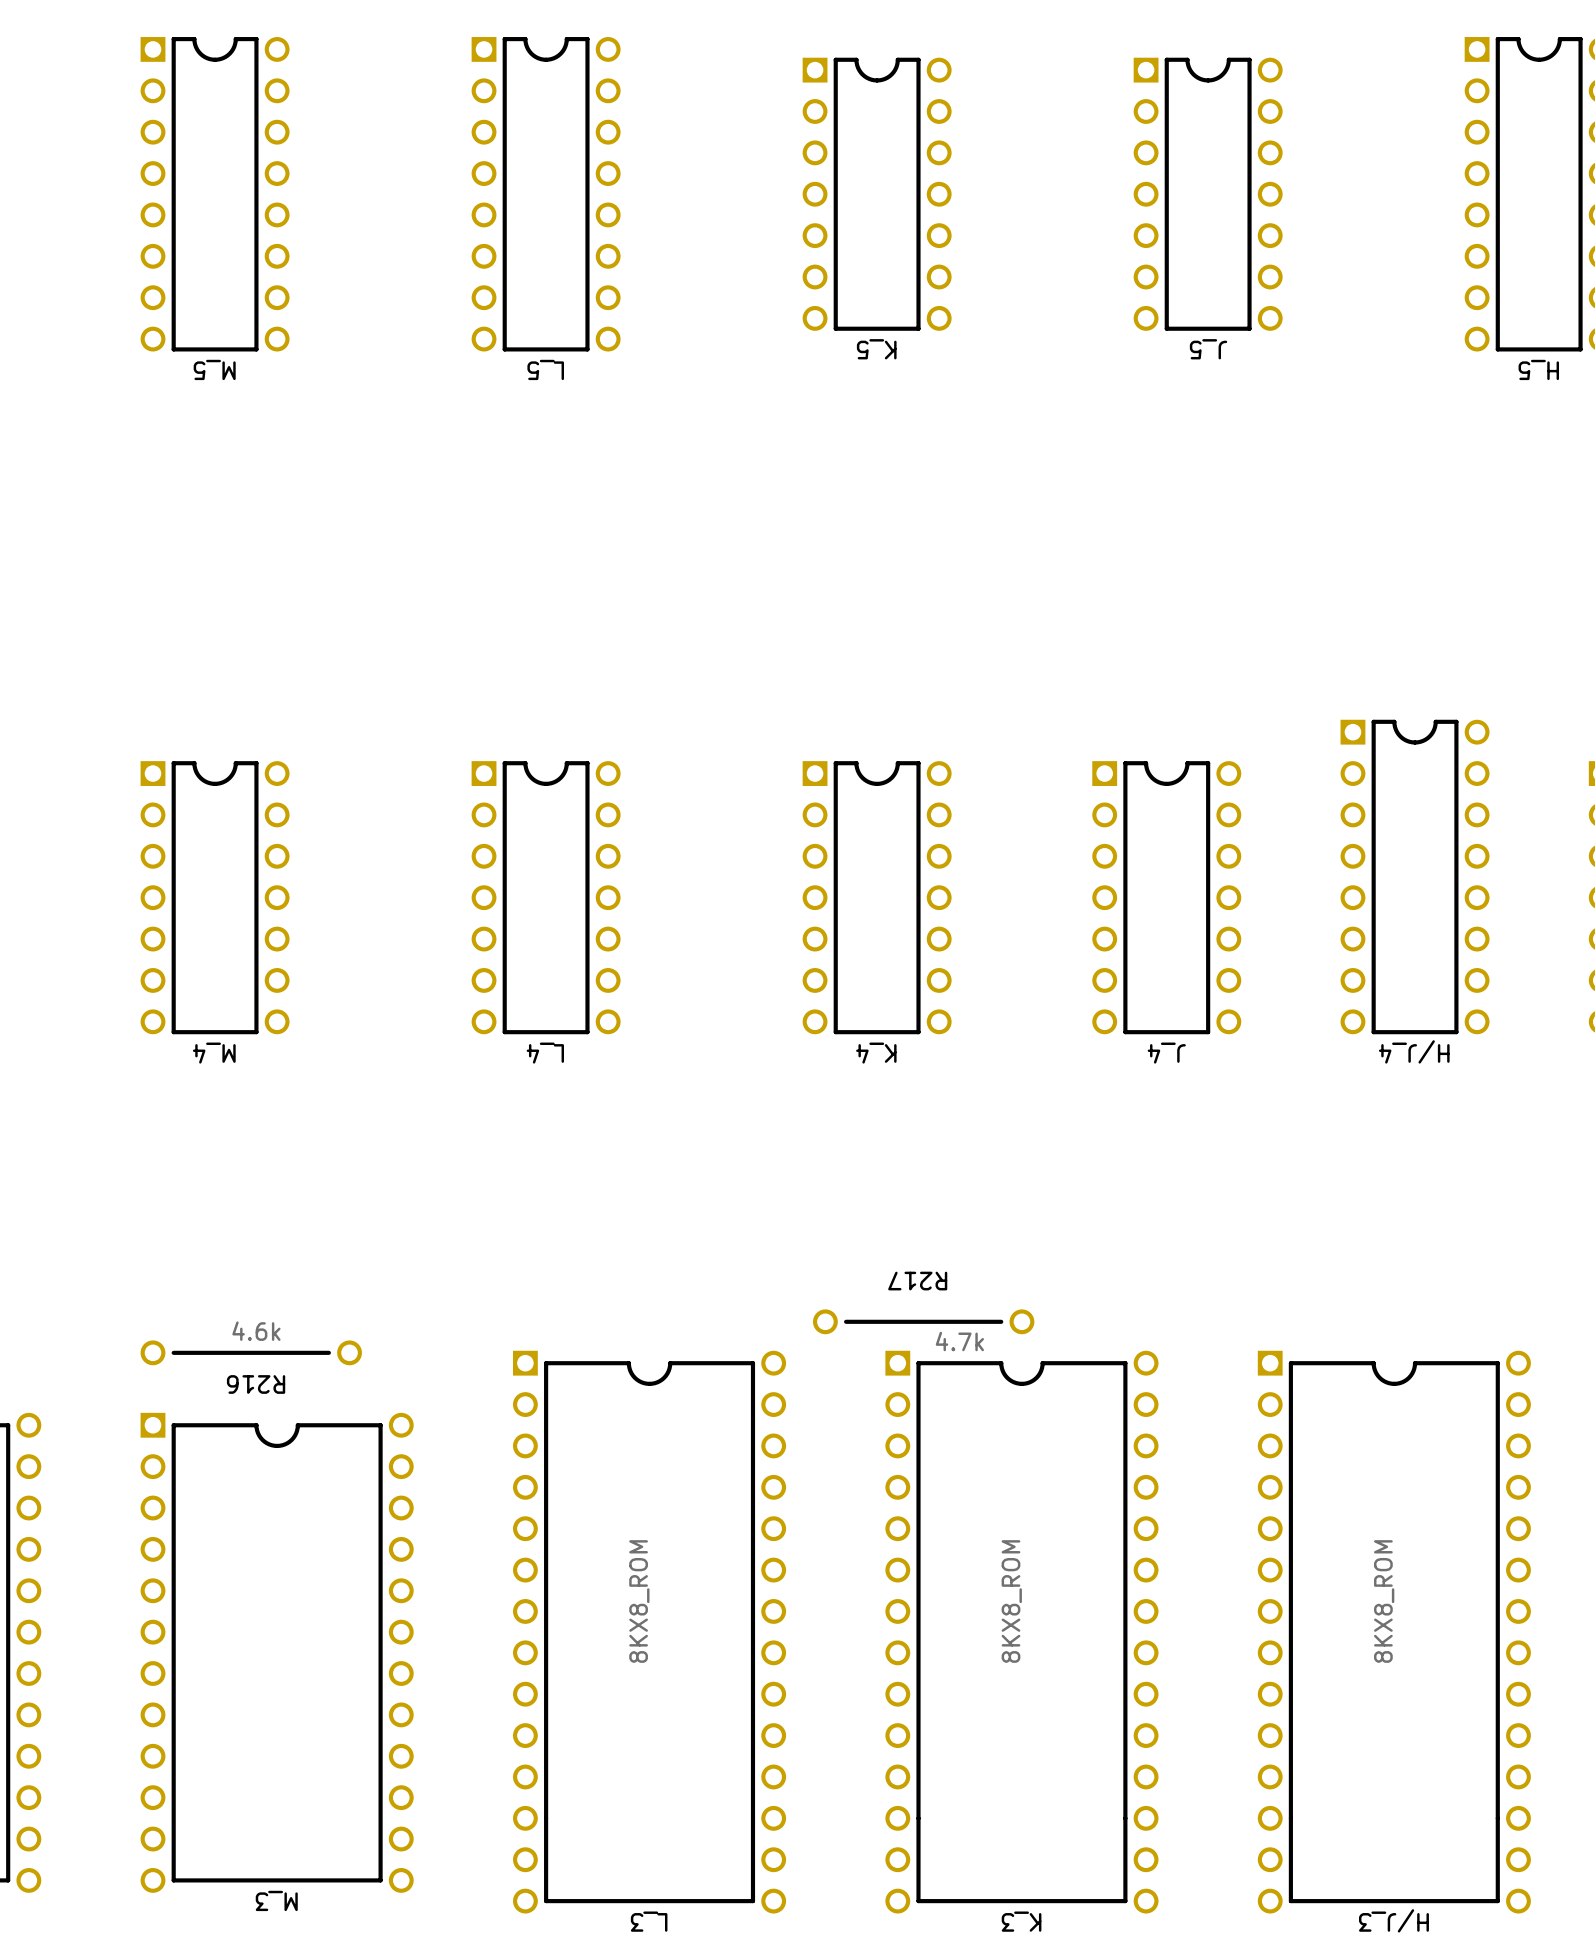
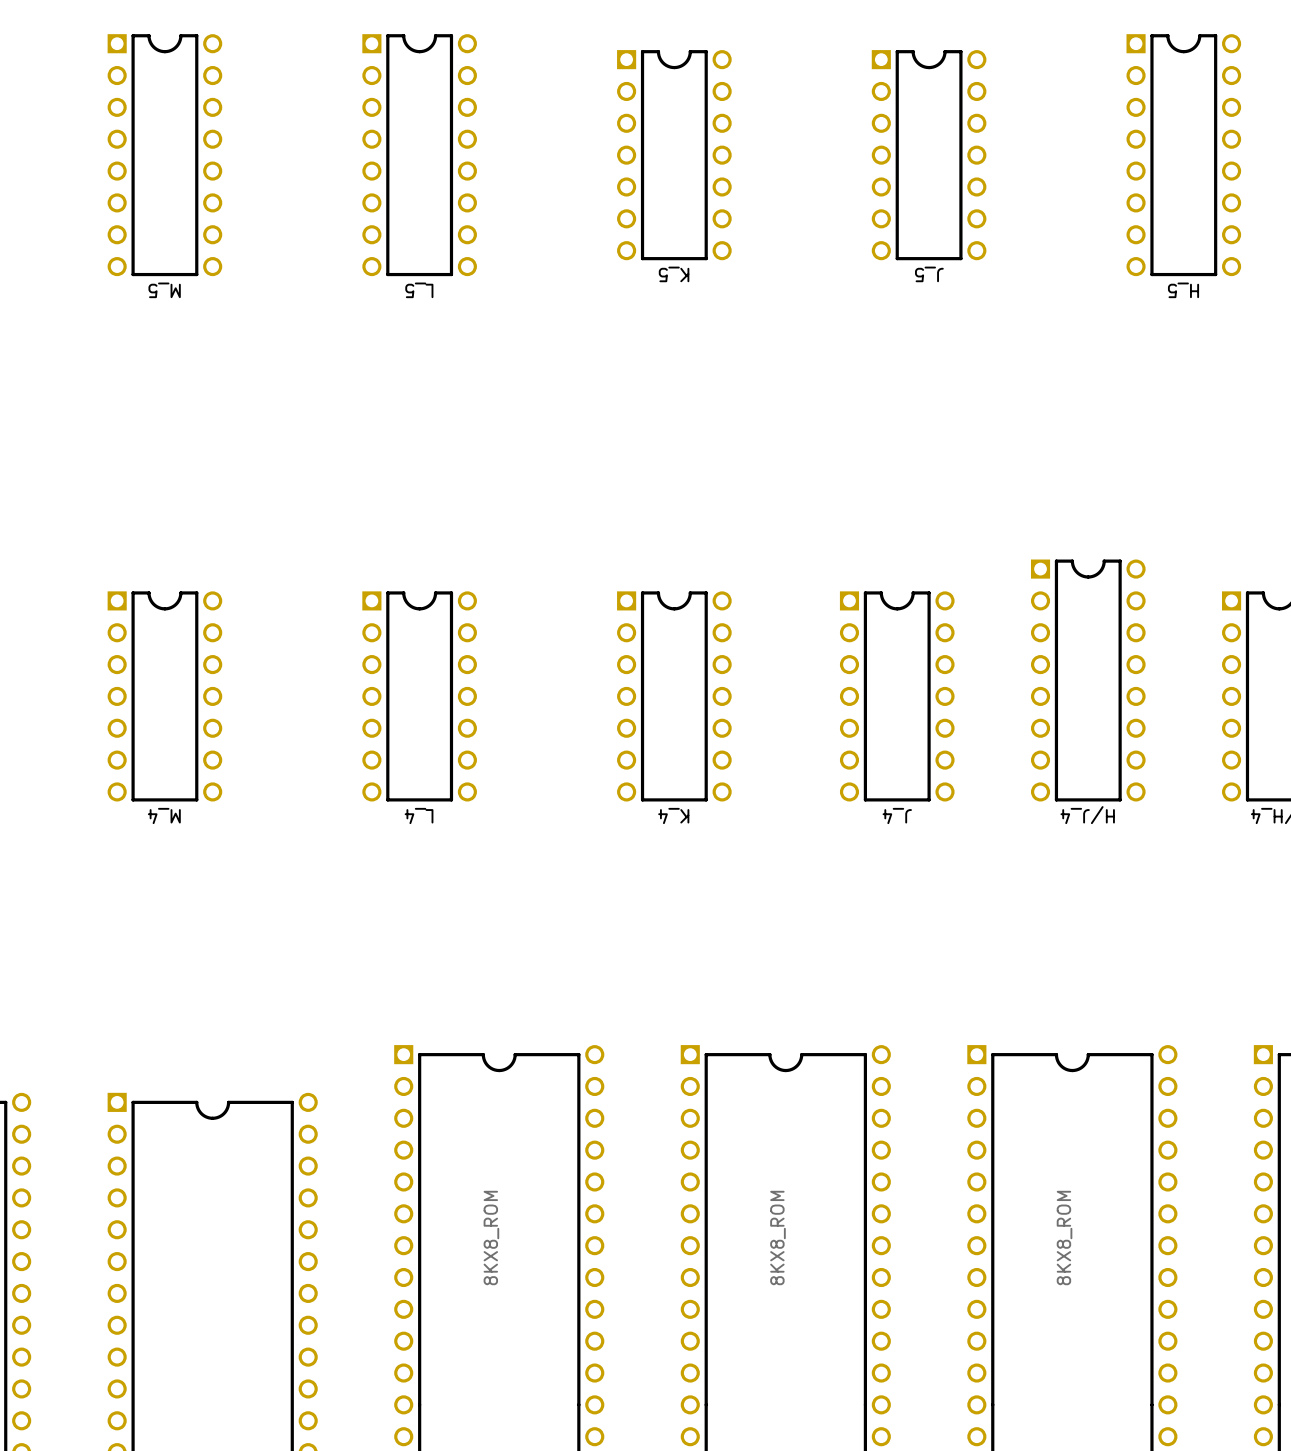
R217: 4.7k (923, 1321) -> none
R216: 4.6k (251, 1352) -> none

